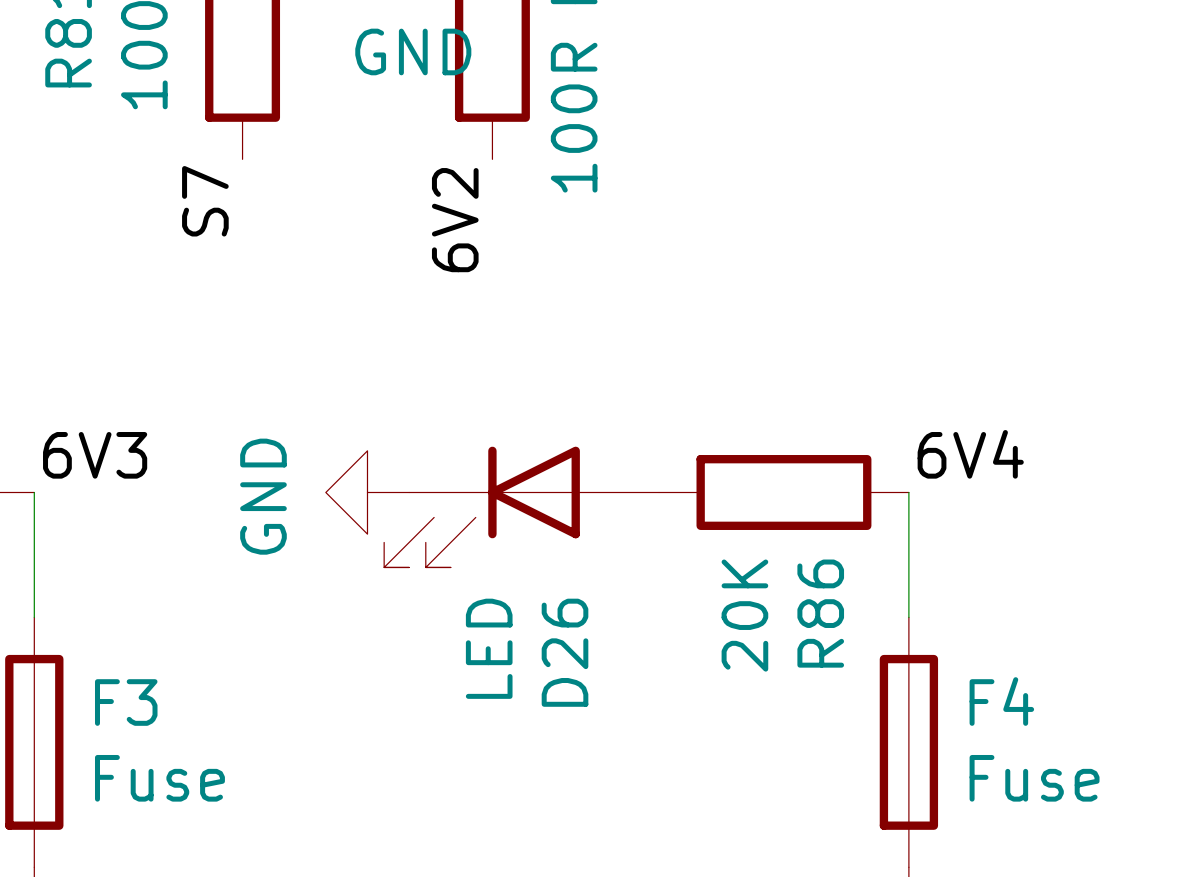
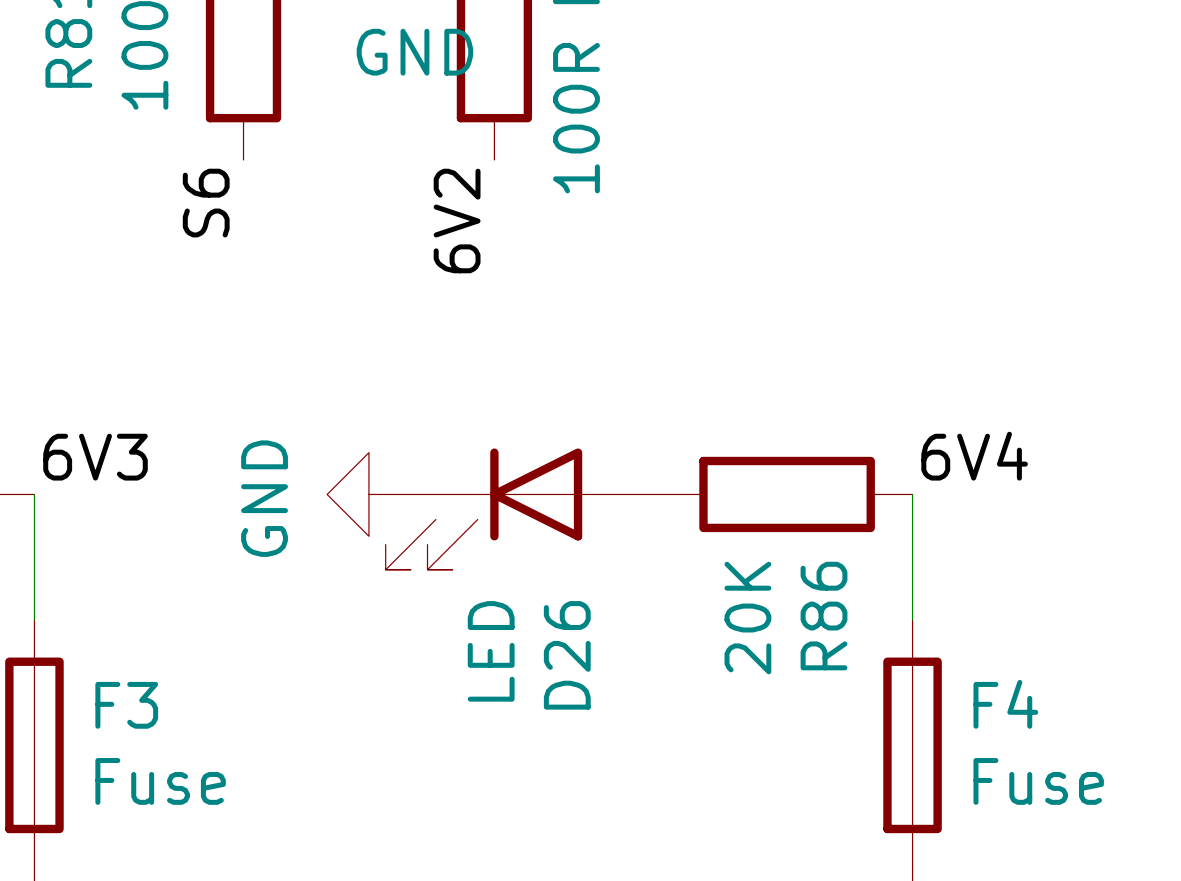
label: S7 (205, 201) -> S6 (206, 203)

